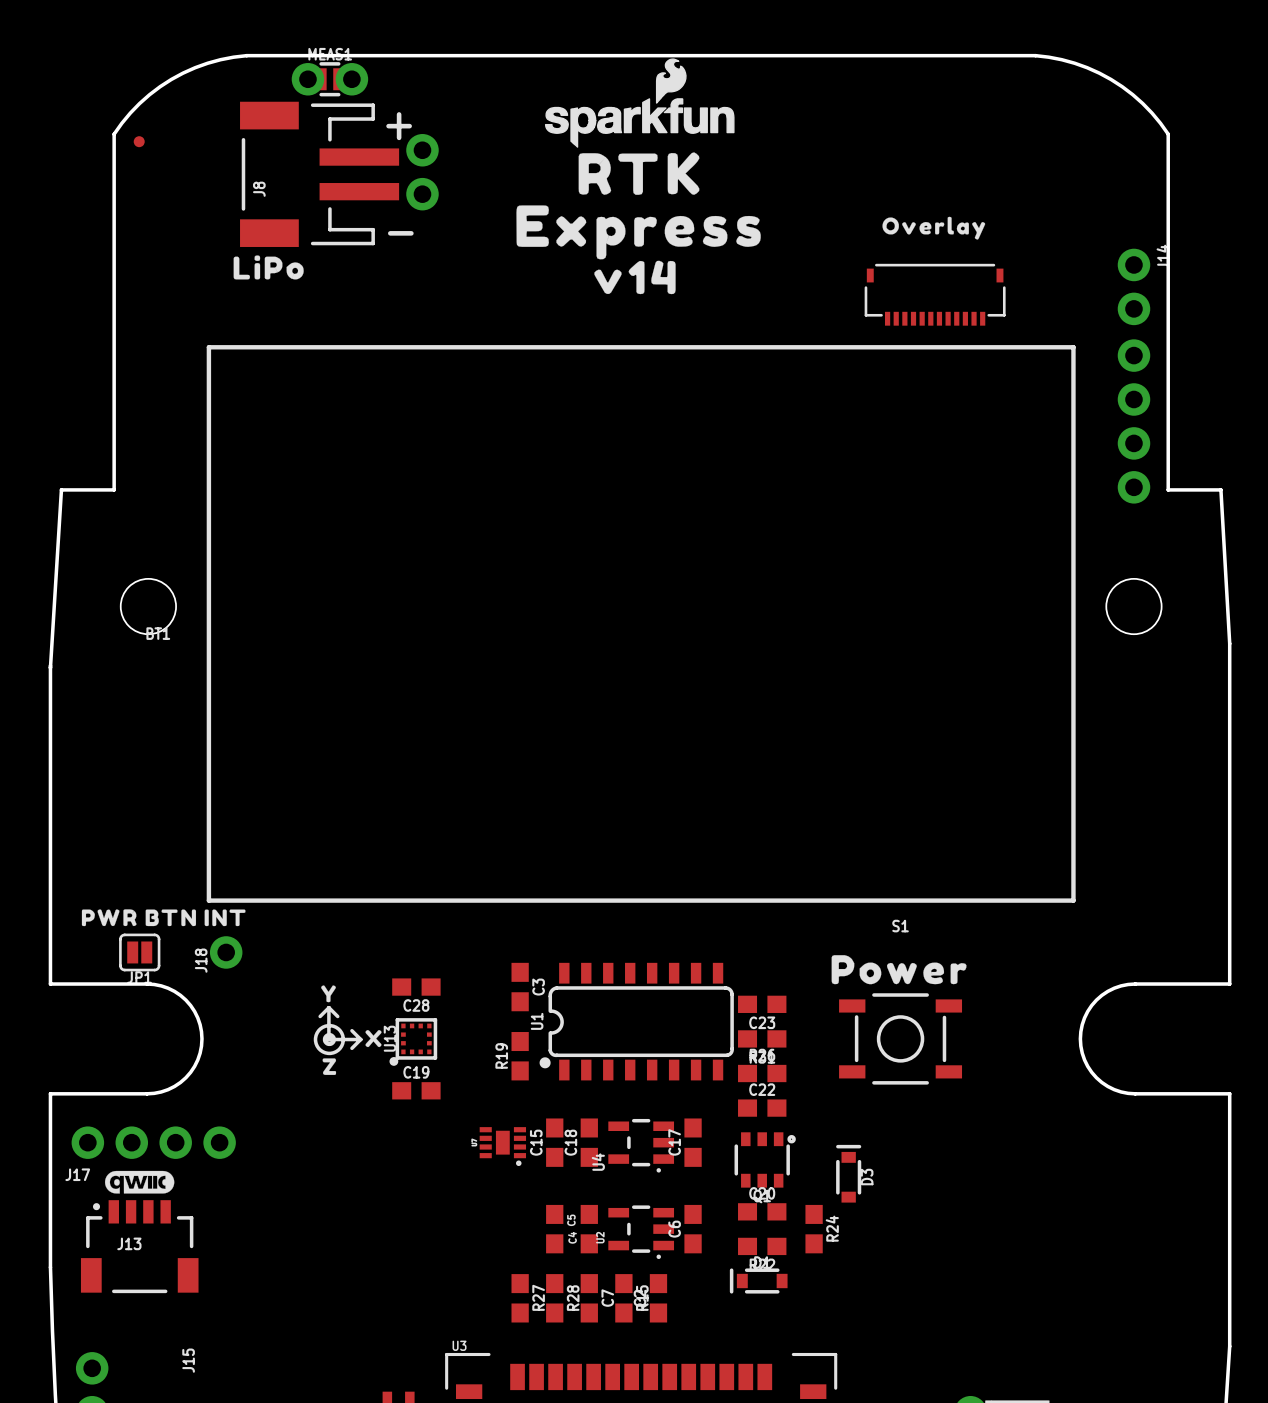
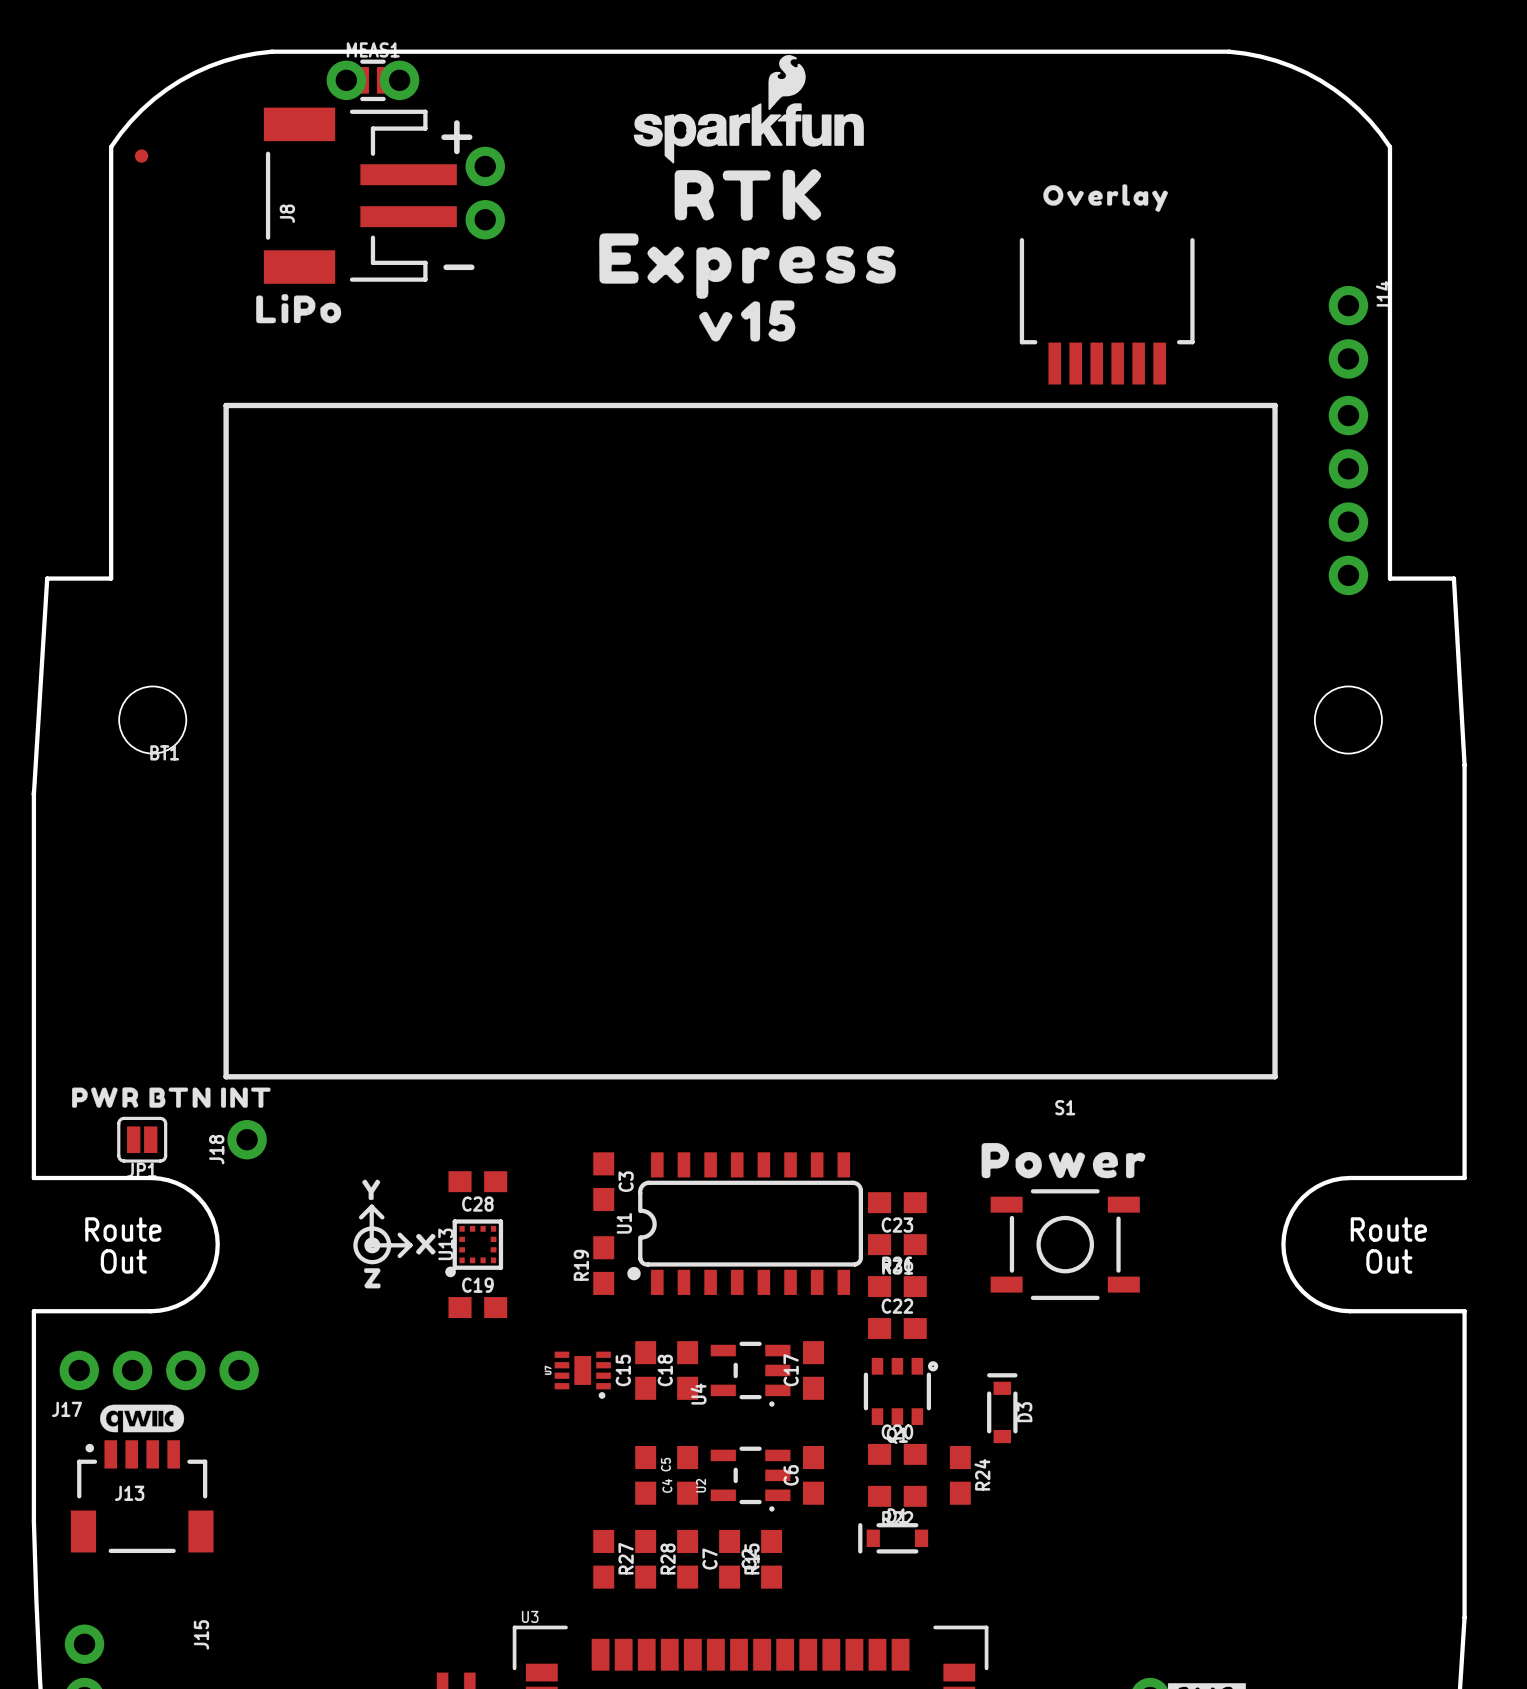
drawing position: (933, 228) -> (1105, 198)
drawing shape: [594, 260, 676, 295] -> [699, 300, 796, 342]
part: none -> (1107, 311)
part: (935, 294) -> none
text: none -> Route (123, 1229)
text: none -> Route (1388, 1229)
text: none -> Out (123, 1261)
text: none -> Out (1389, 1261)

